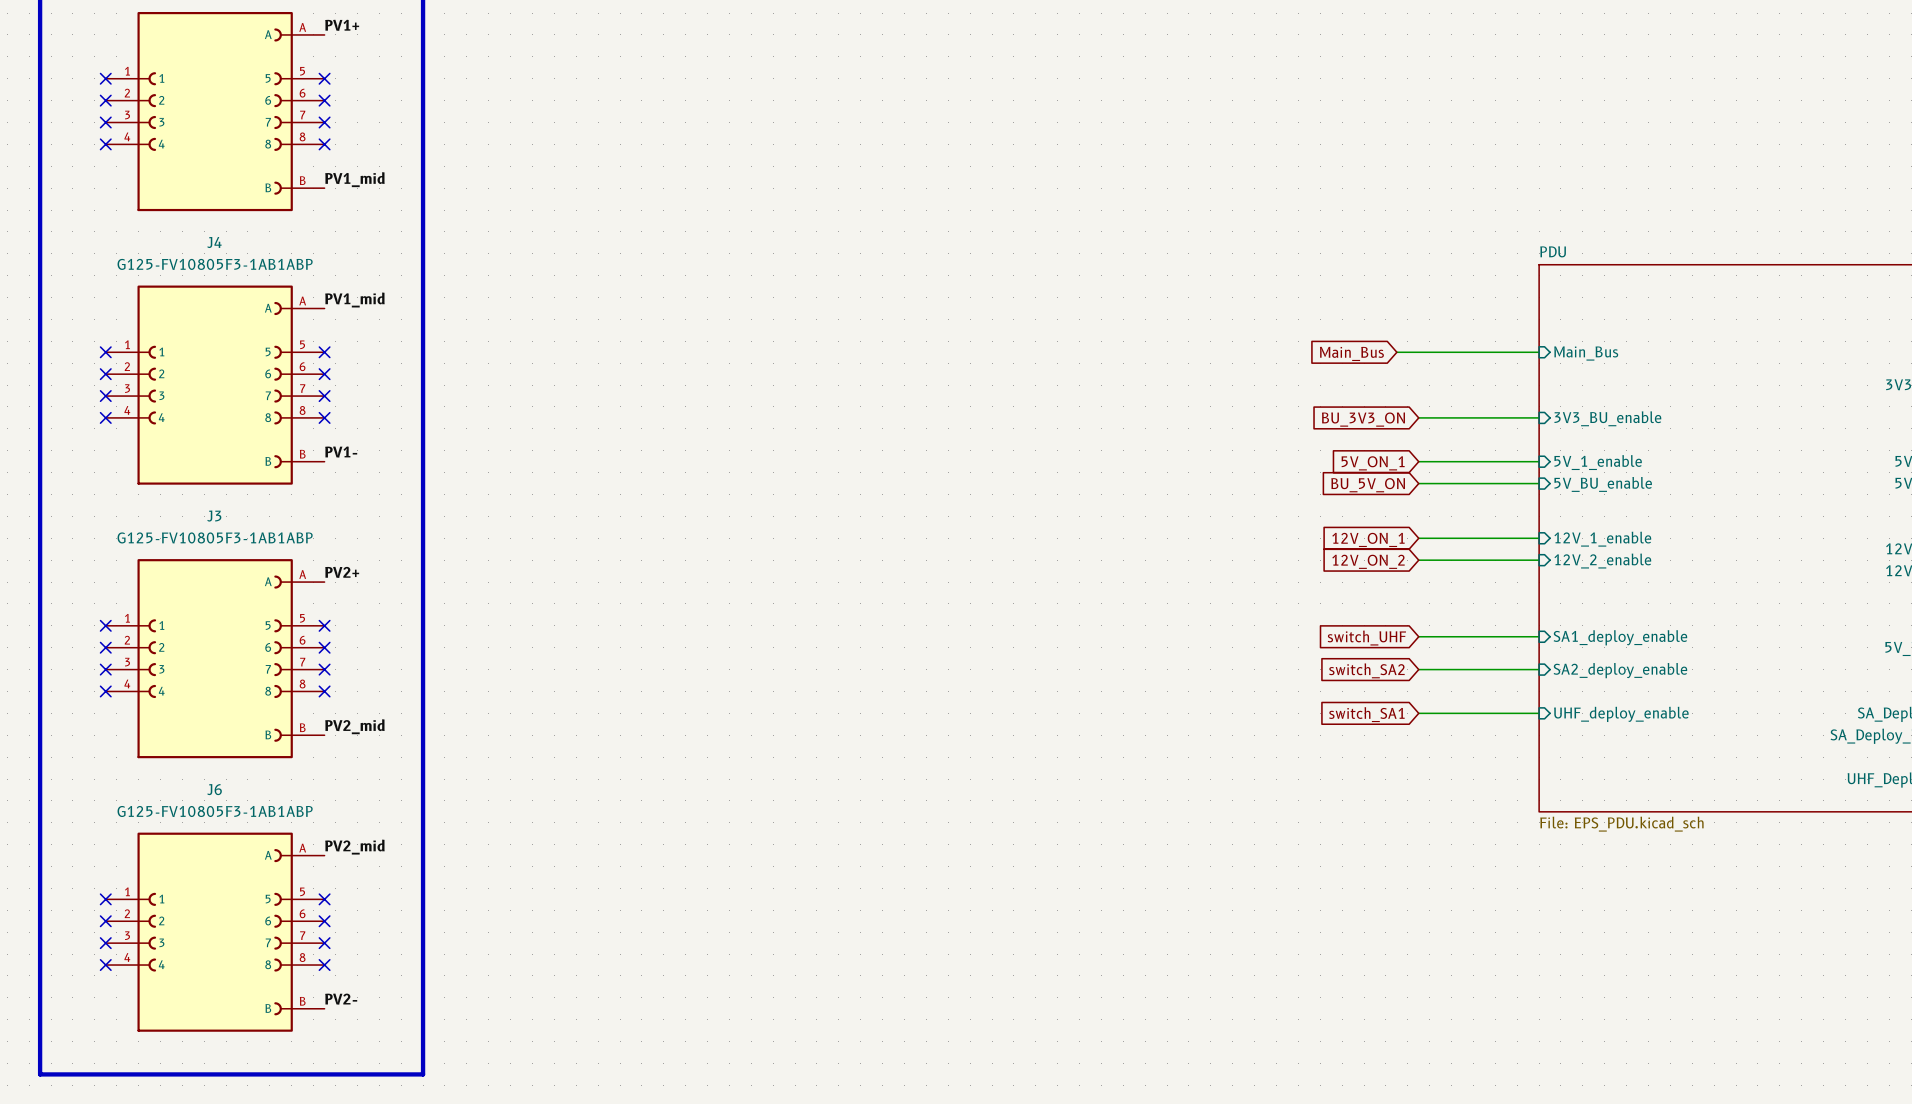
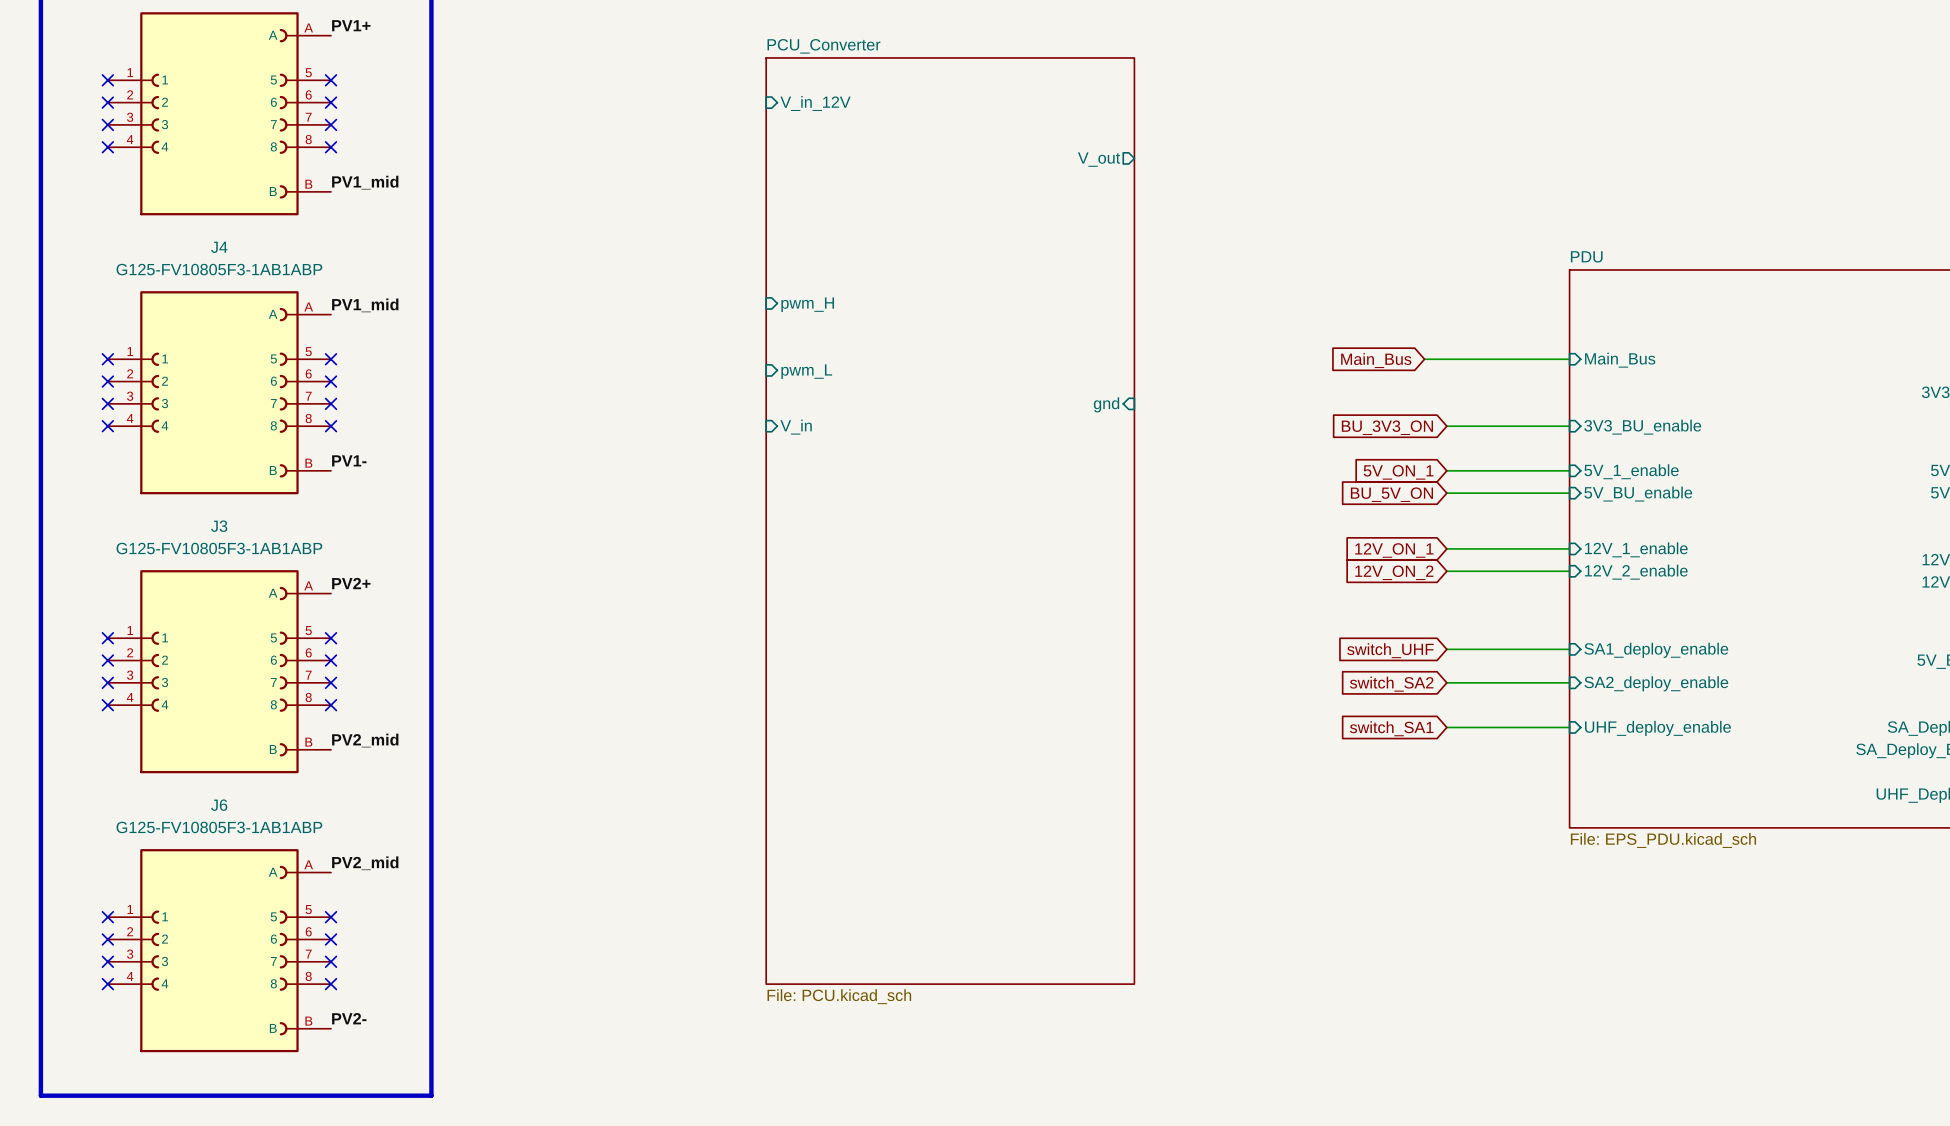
sheet pin: none -> V_in_12V (815, 103)
sheet pin: none -> V_out (1099, 159)
sheet pin: none -> pwm_H (807, 304)
sheet pin: none -> pwm_L (806, 371)
sheet pin: none -> gnd (1106, 404)
sheet pin: none -> V_in (796, 427)
sheet PCU_Converter: none -> File: PCU.kicad_sch (950, 521)

